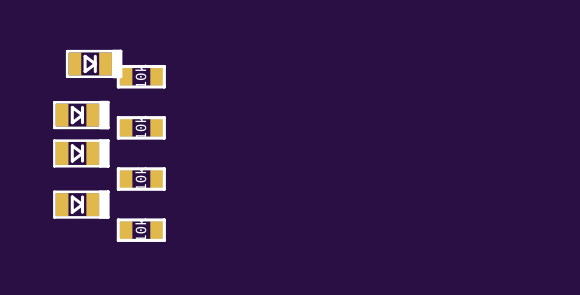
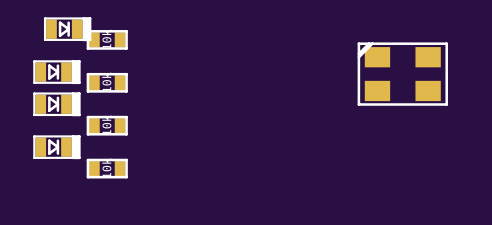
part: none -> (402, 74)

